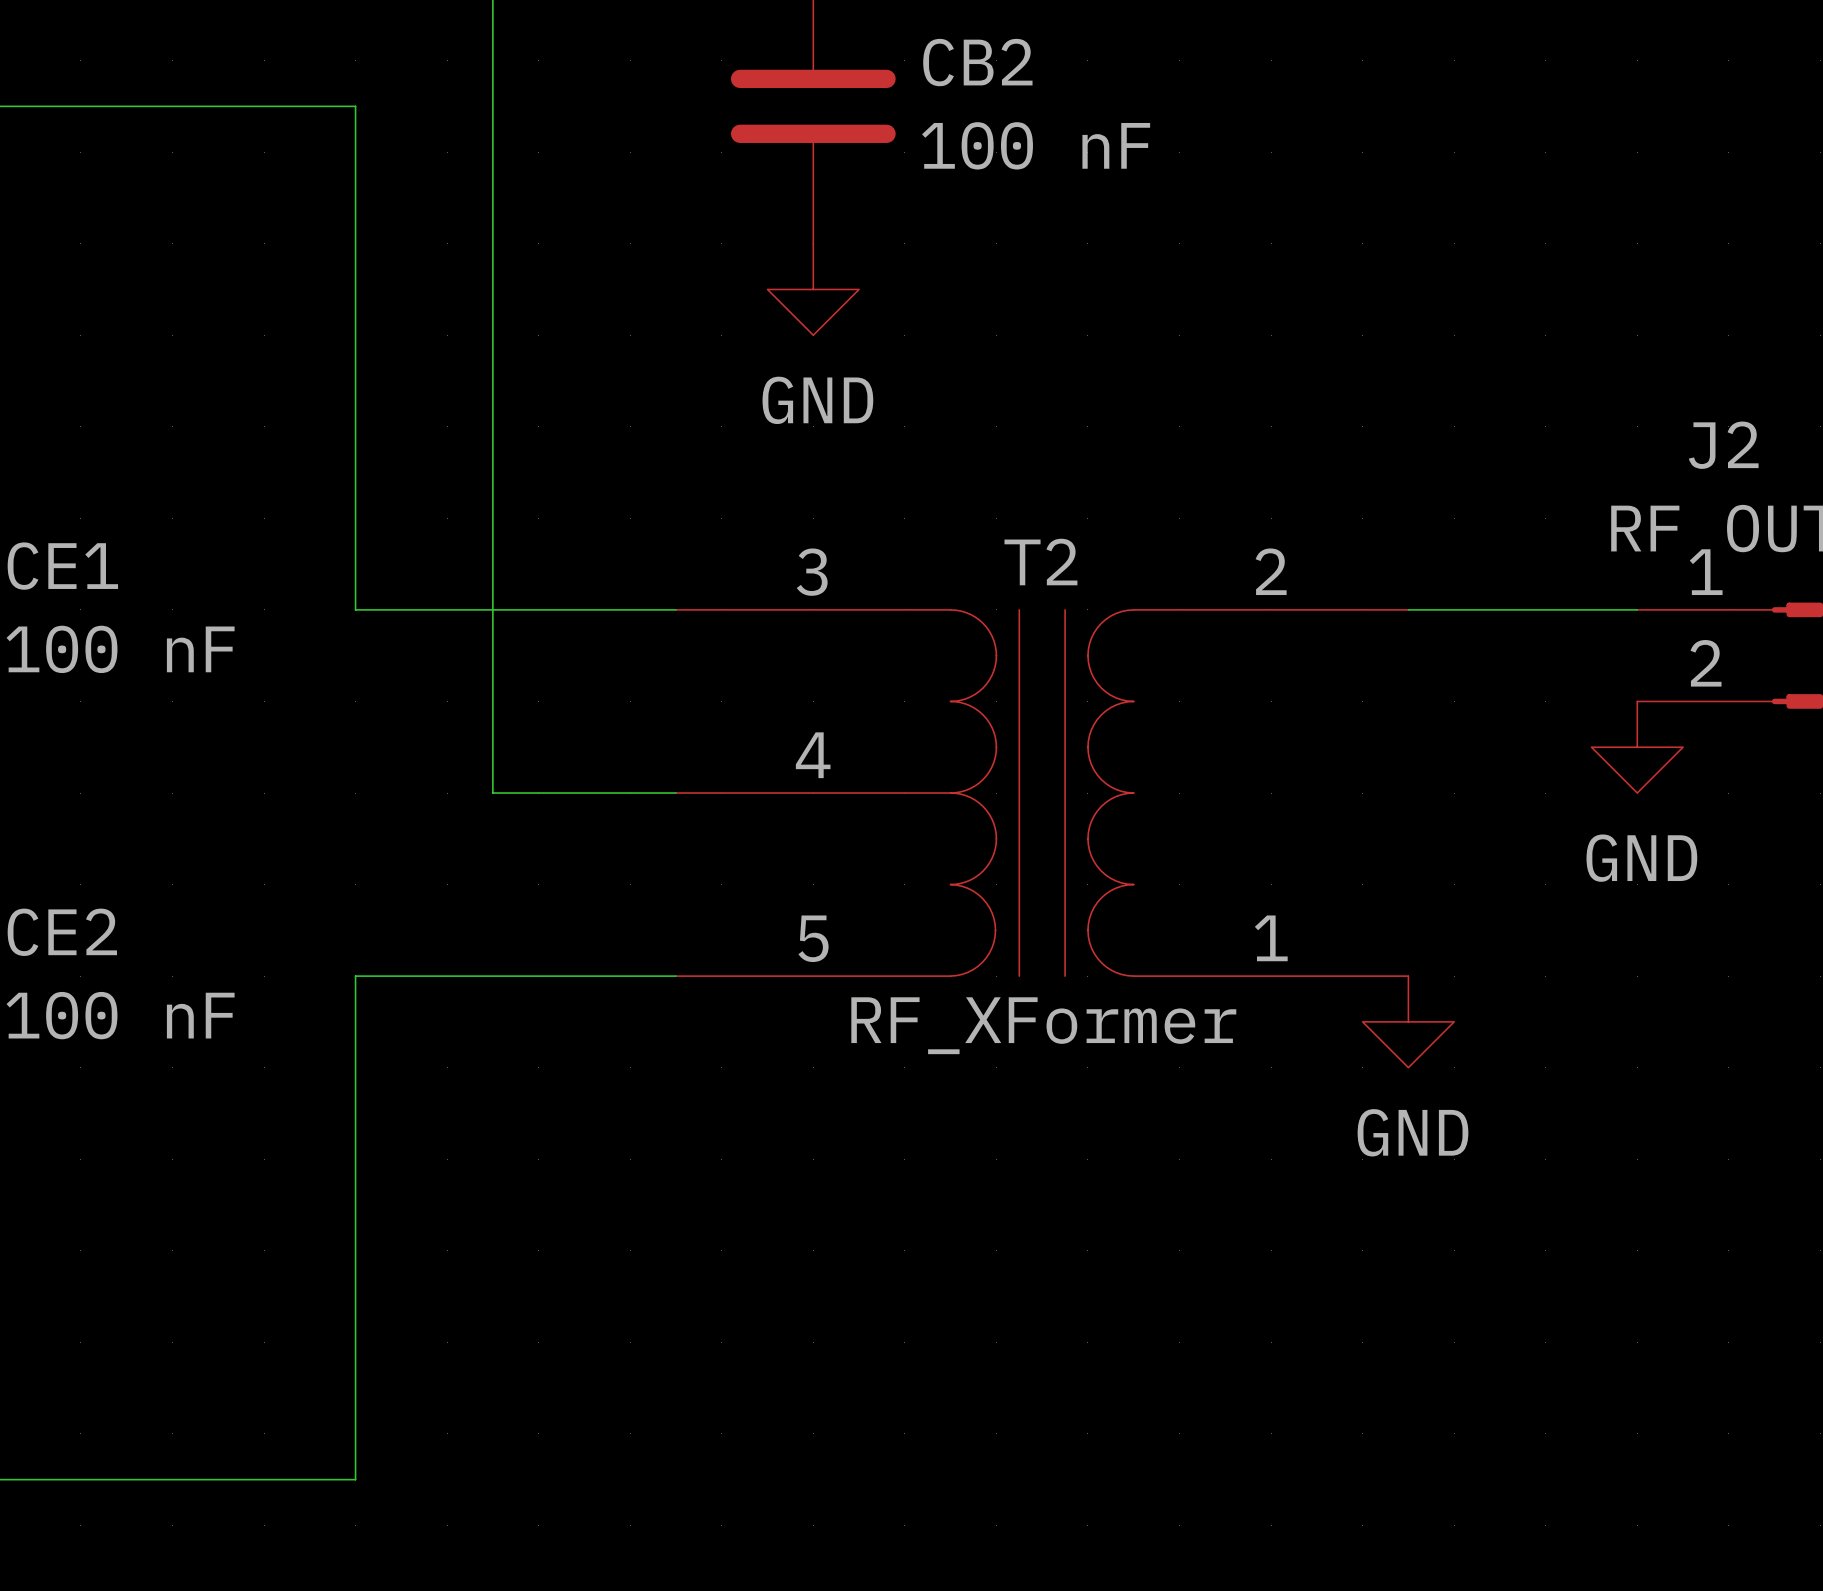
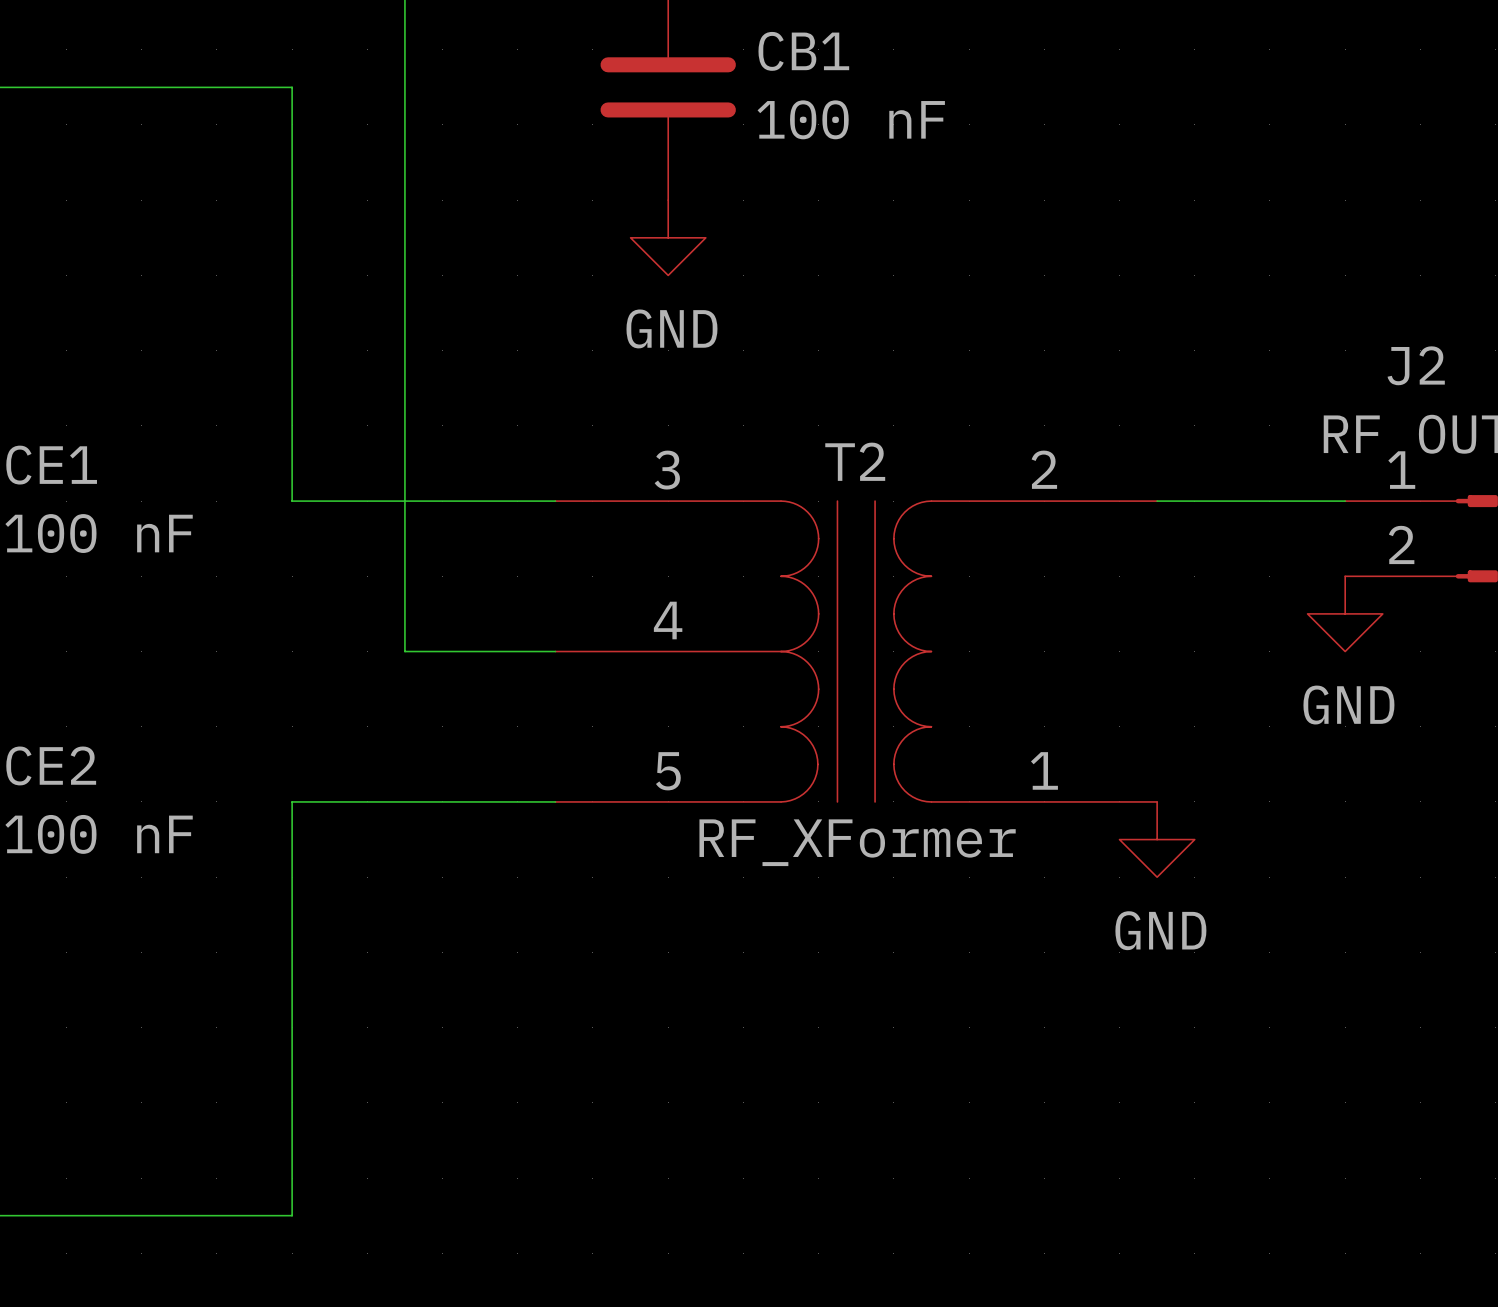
CB2 name: CB2 (977, 62) -> CB1 (803, 51)

